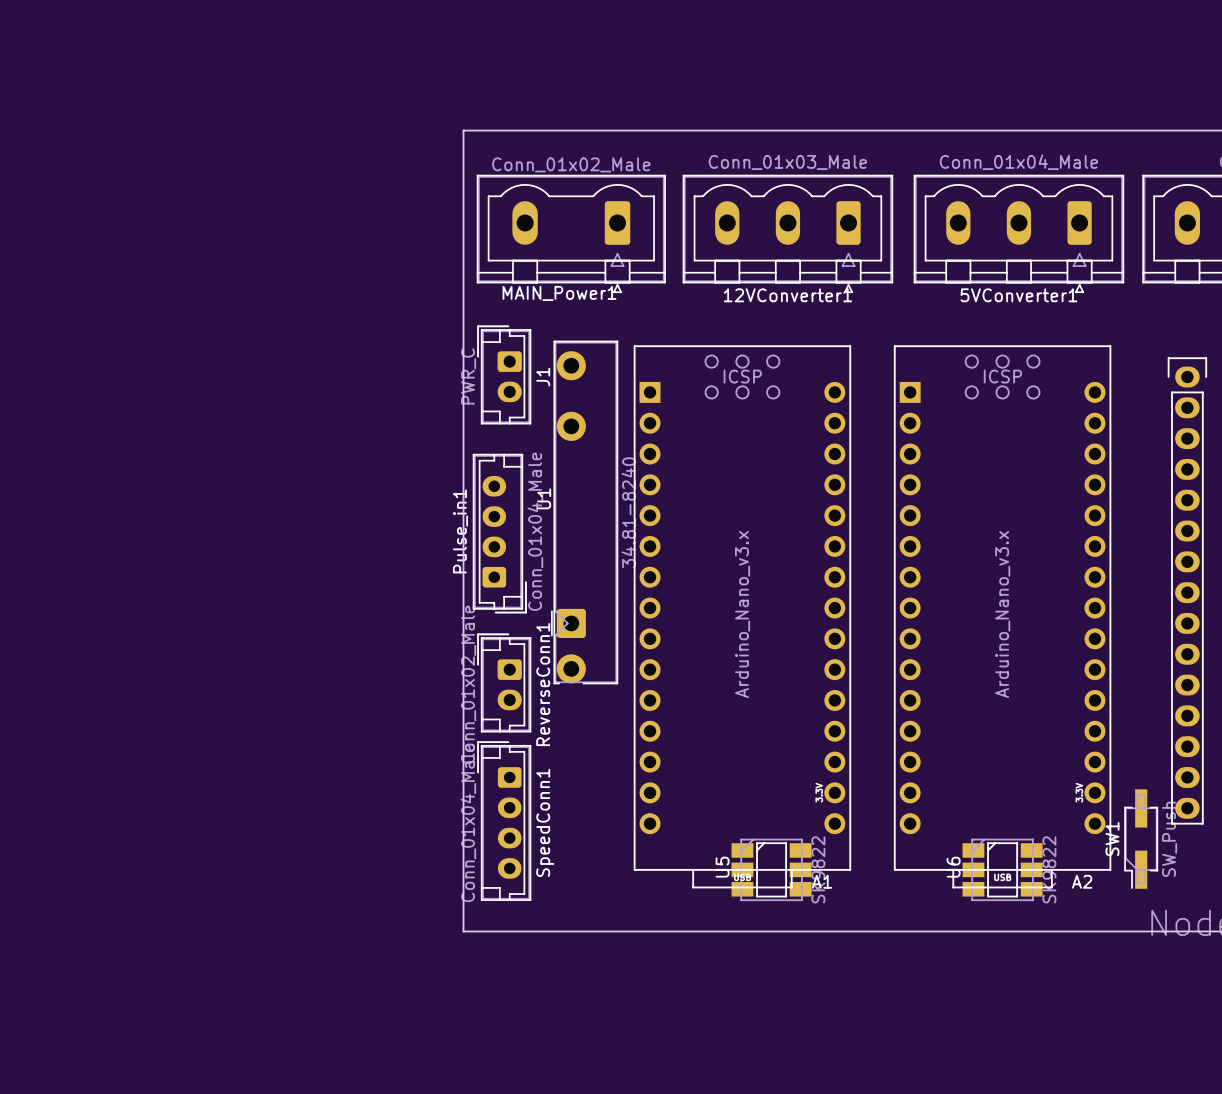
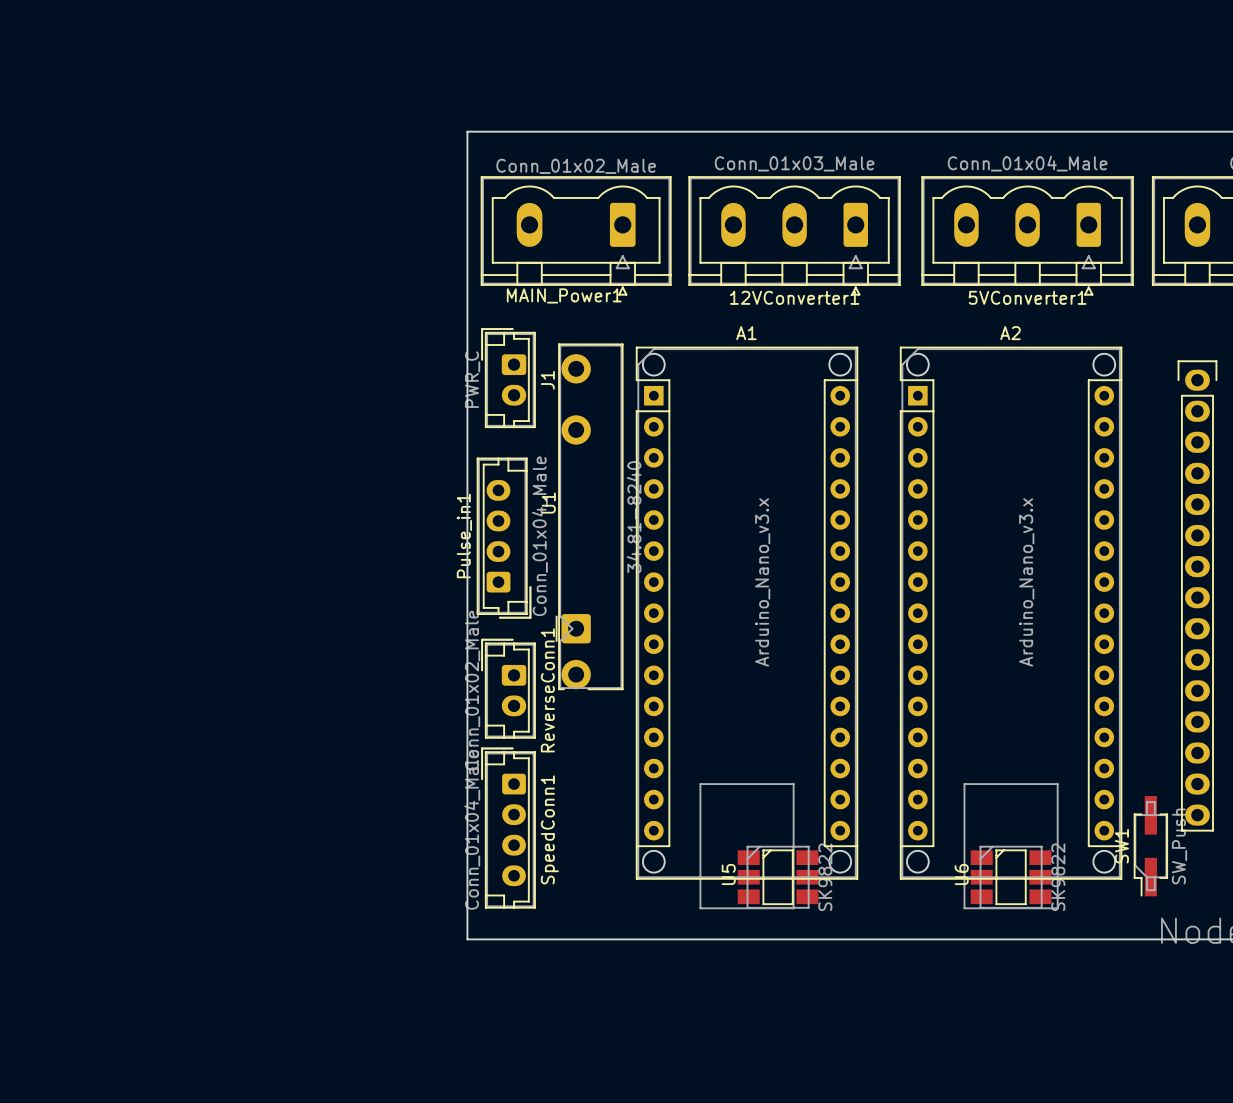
A1 footprint: [633, 345, 852, 889] -> [635, 346, 859, 909]
A2 footprint: [893, 345, 1112, 889] -> [900, 346, 1123, 909]
A1 value position: Arduino_Nano_v3.x (742, 614) -> Arduino_Nano_v3.x (762, 582)
A2 value position: Arduino_Nano_v3.x (1002, 614) -> Arduino_Nano_v3.x (1026, 582)
A1 name position: A1 (821, 881) -> A1 (746, 333)
A2 name position: A2 (1082, 881) -> A2 (1010, 333)

